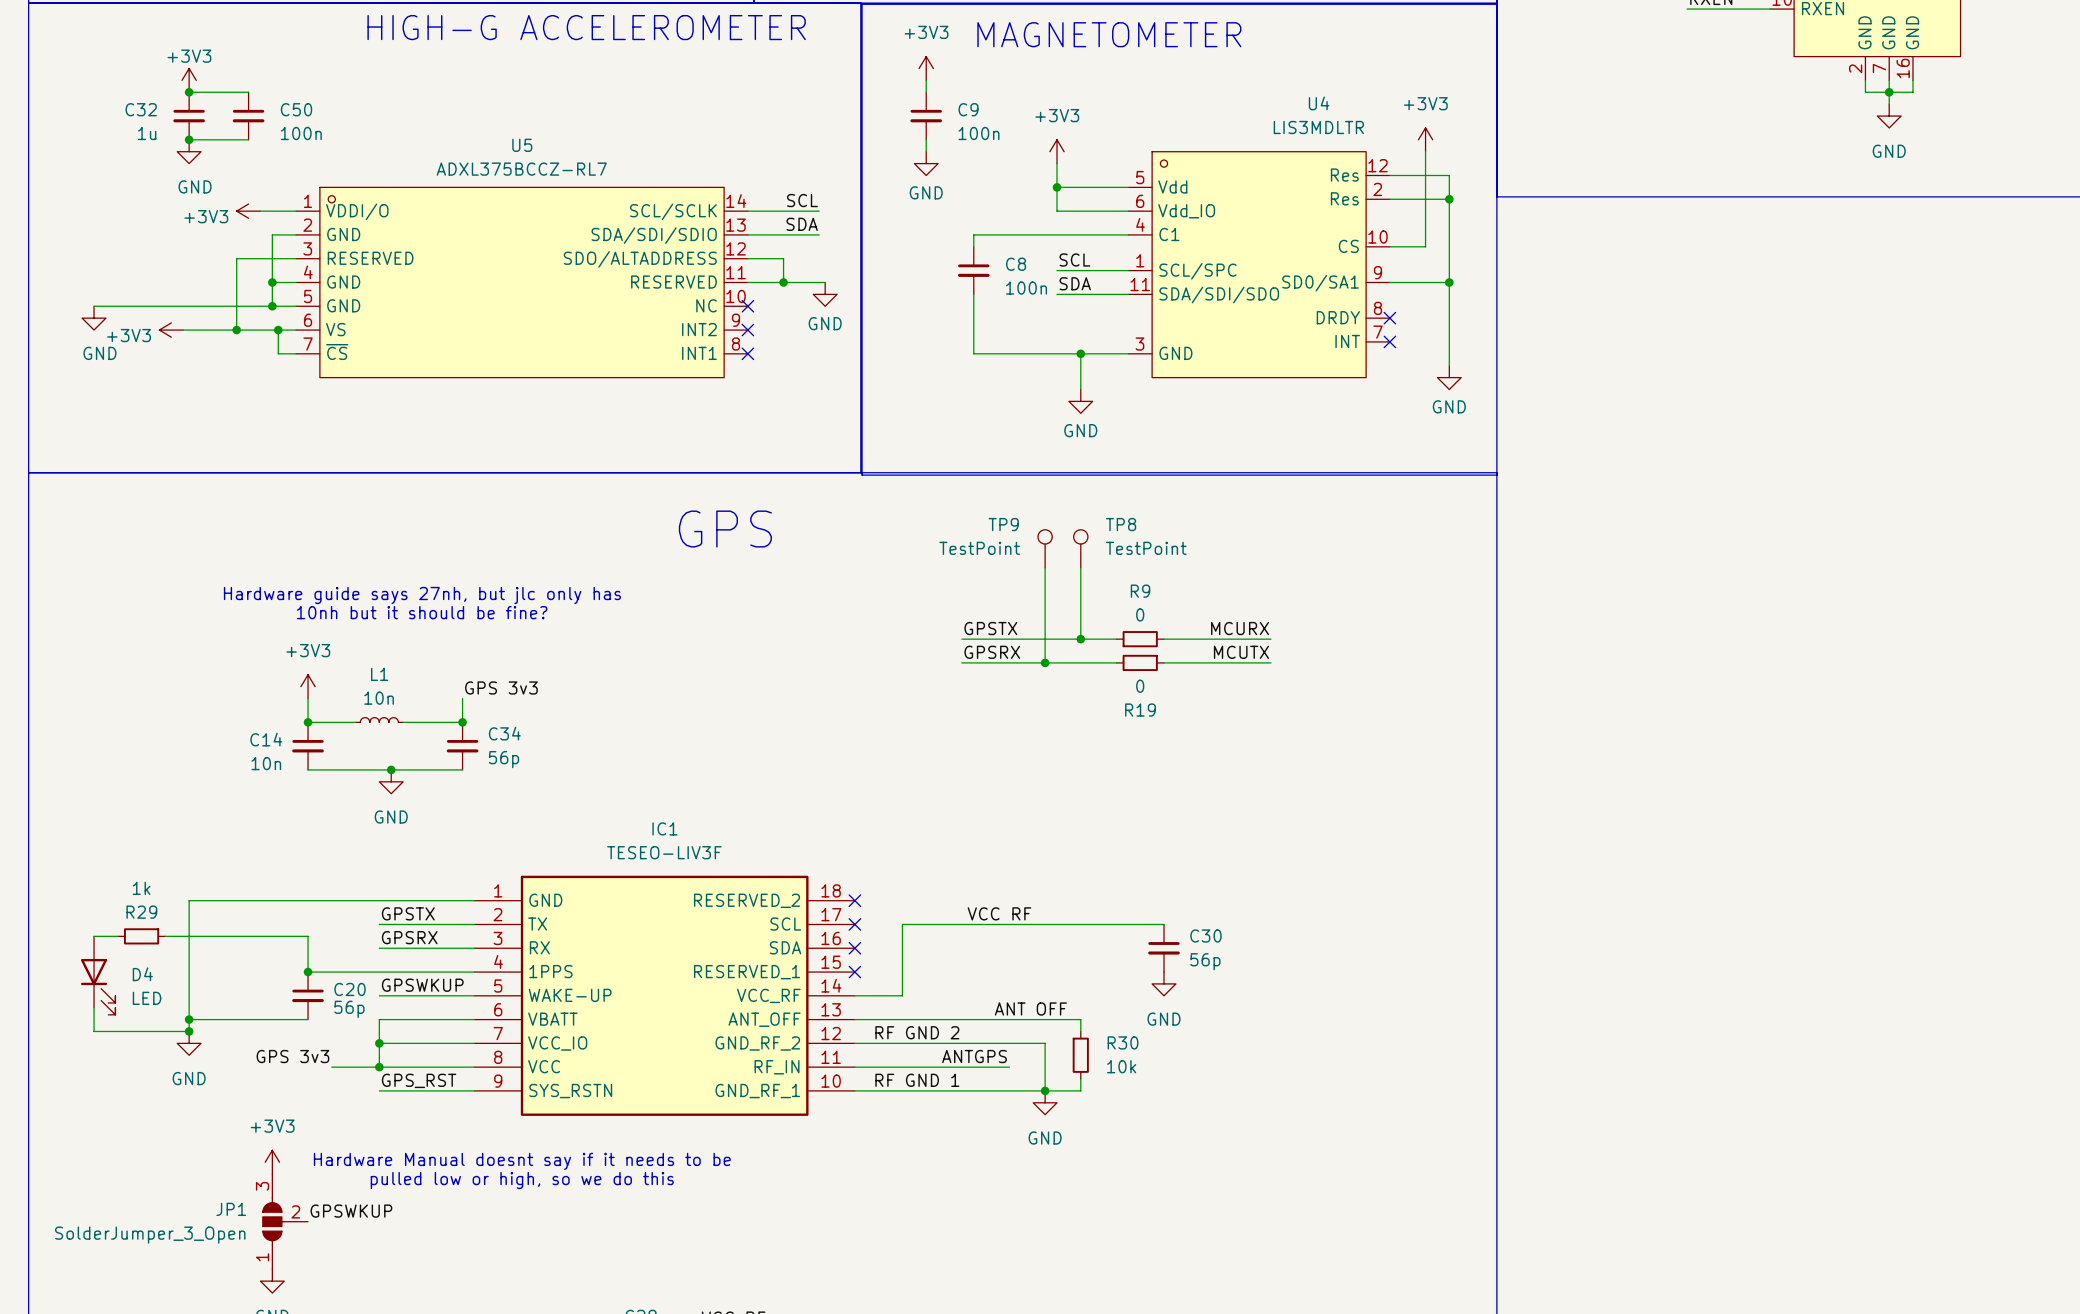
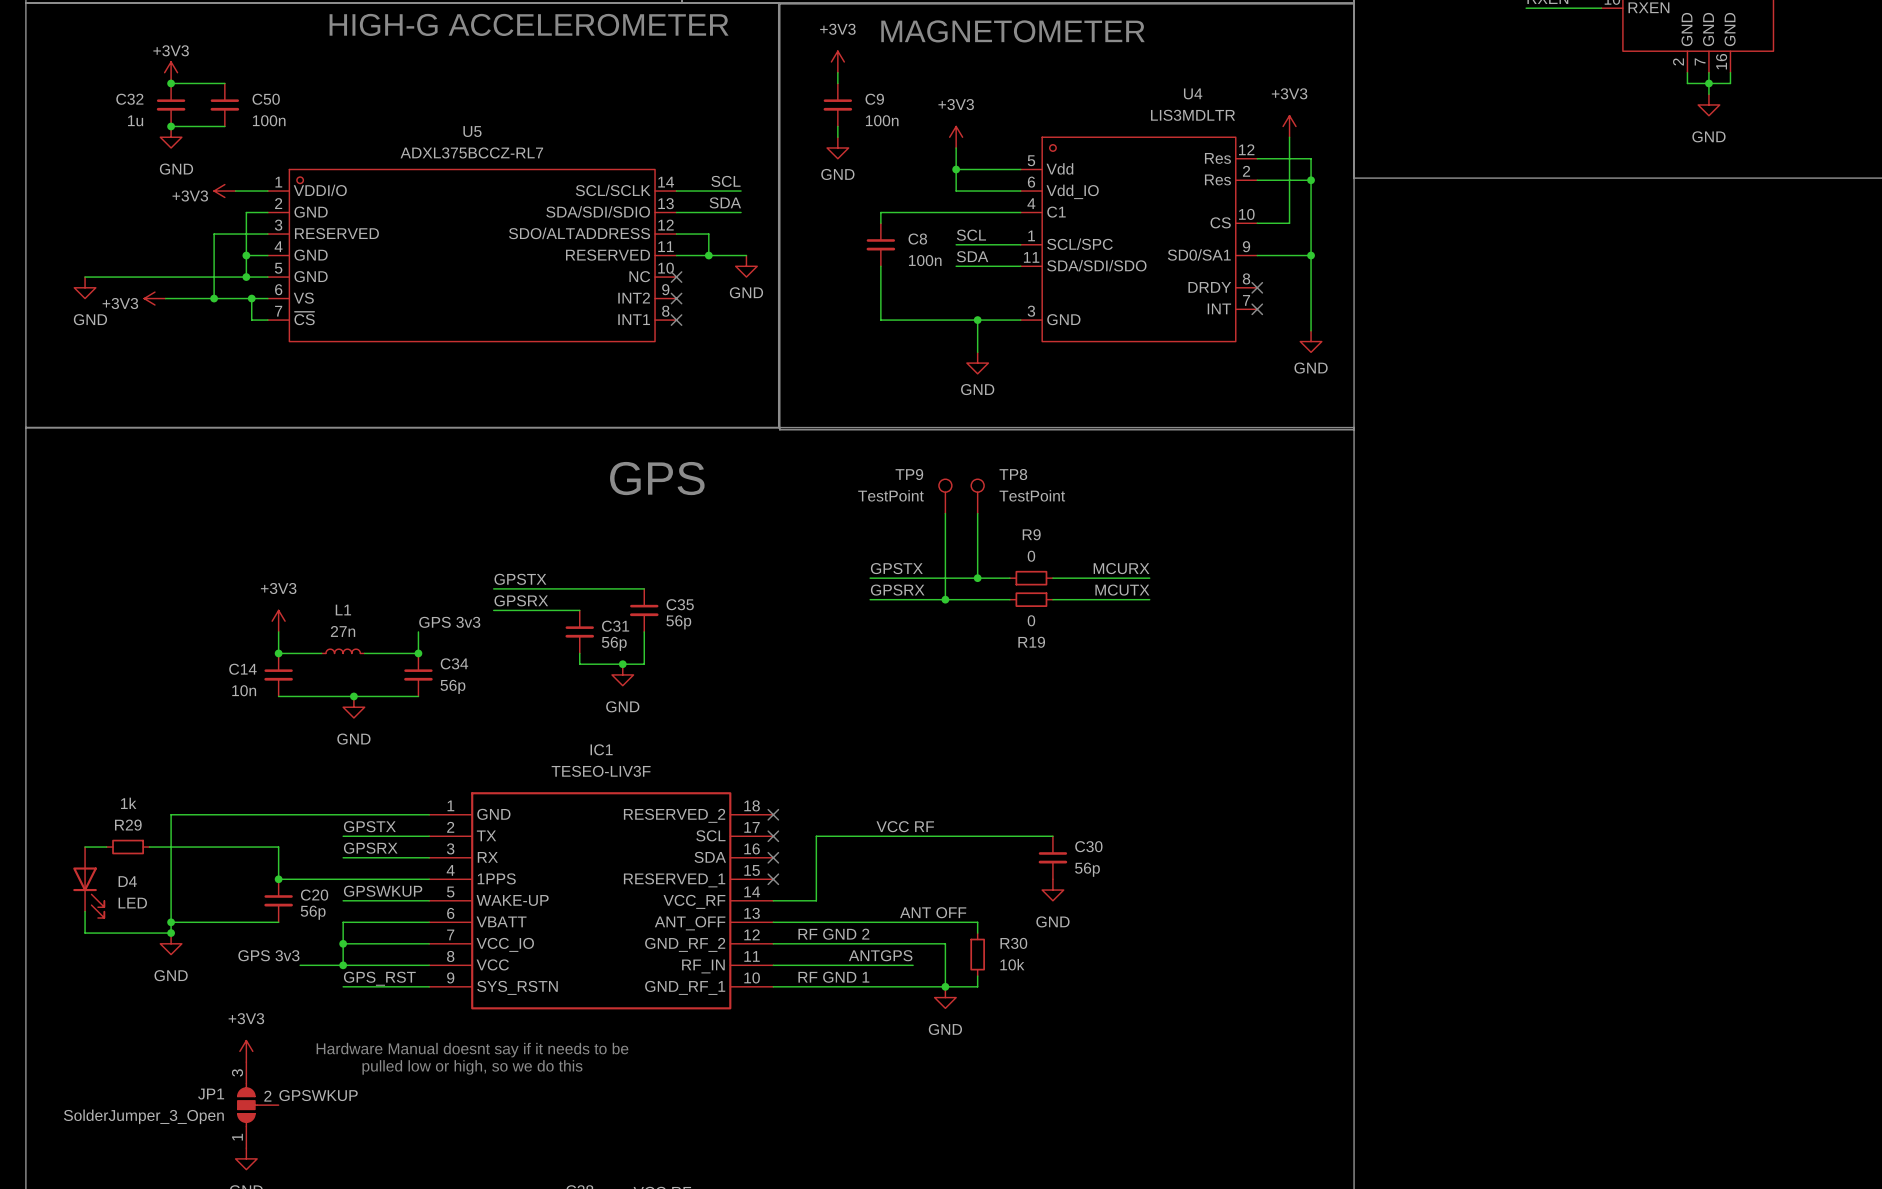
text: Hardware guide says 27nh, but jlc only has (422, 595) -> none
text: 10nh but it should be fine? (422, 612) -> none
label: none -> GPSTX (520, 579)
wire: none -> (493, 588) (644, 588)
label: none -> GPSRX (521, 600)
wire: none -> (493, 610) (579, 610)
C35: none -> 56p (644, 610)
L1 value: 10n (379, 698) -> 27n (343, 631)
C31: none -> 56p (579, 631)
wire: none -> (644, 631) (644, 664) (579, 664) (579, 653)
junction: none -> (622, 664)
power symbol: none -> GND (622, 674)

